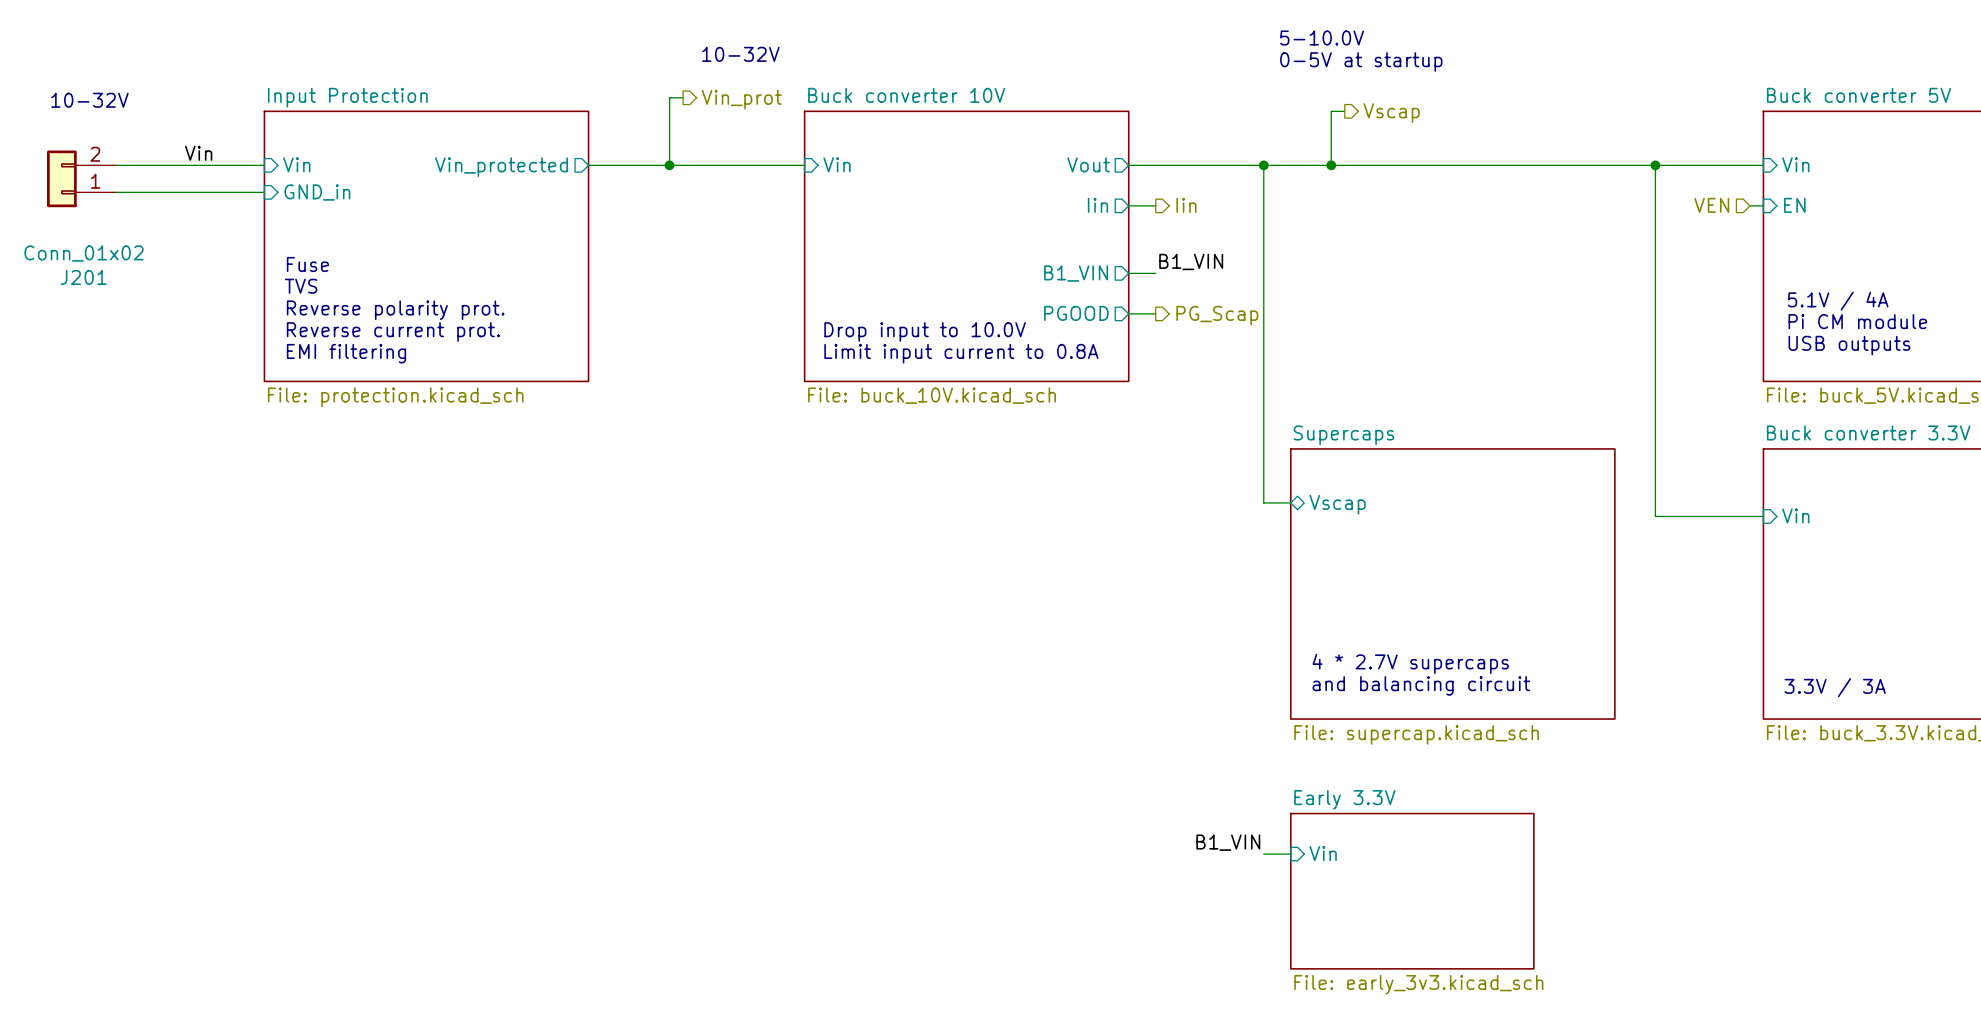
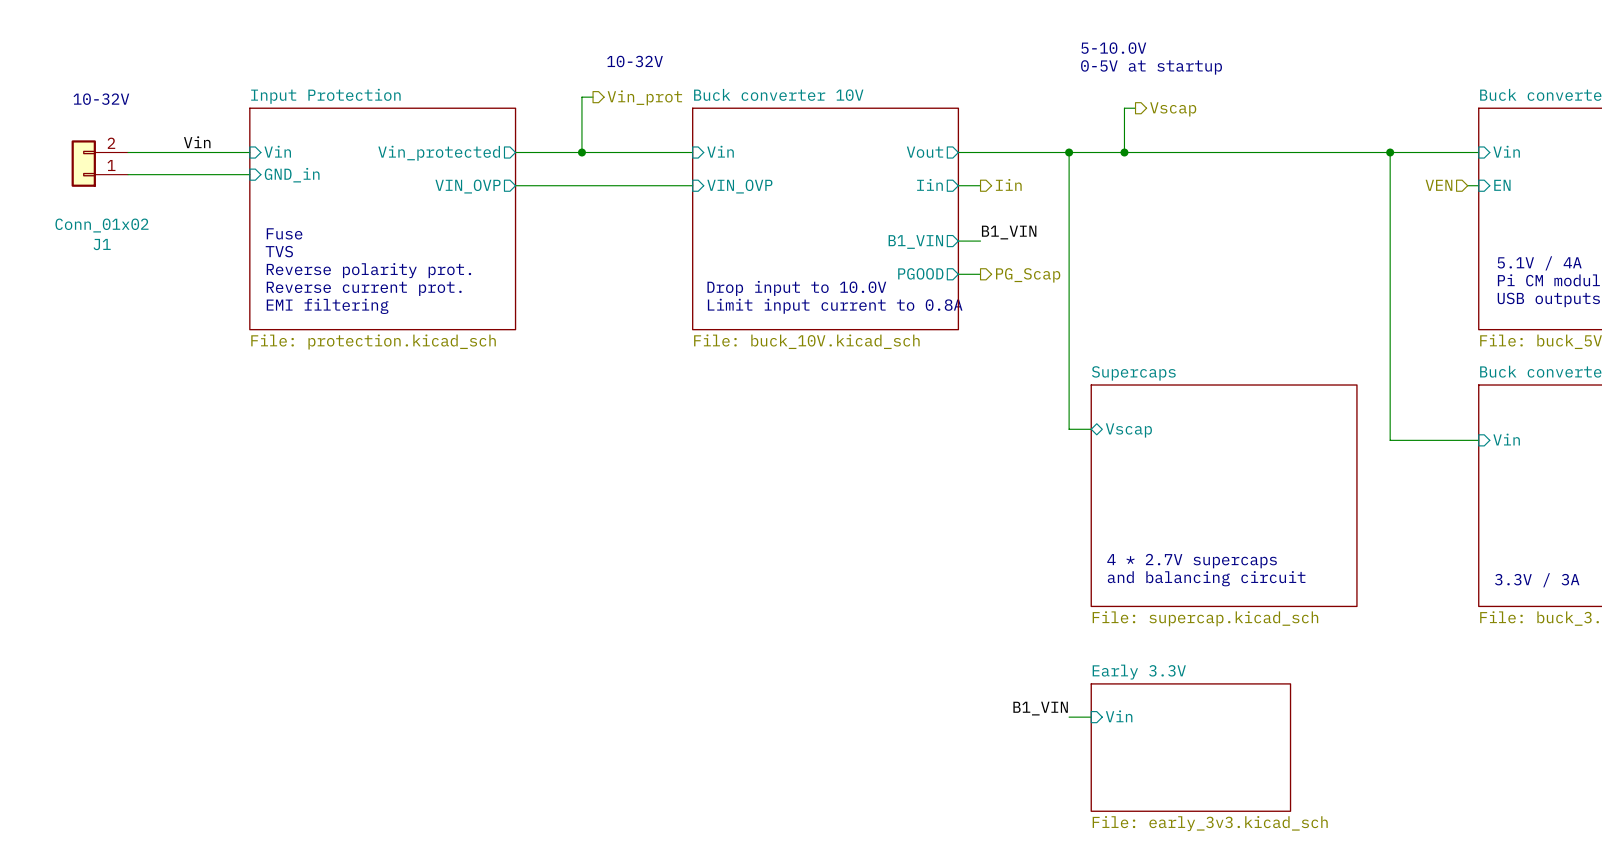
wire: none -> (515, 185) (692, 185)
sheet pin: none -> VIN_OVP (468, 186)
sheet pin: none -> VIN_OVP (739, 186)
J201 name: J201 (83, 277) -> J1 (102, 244)

